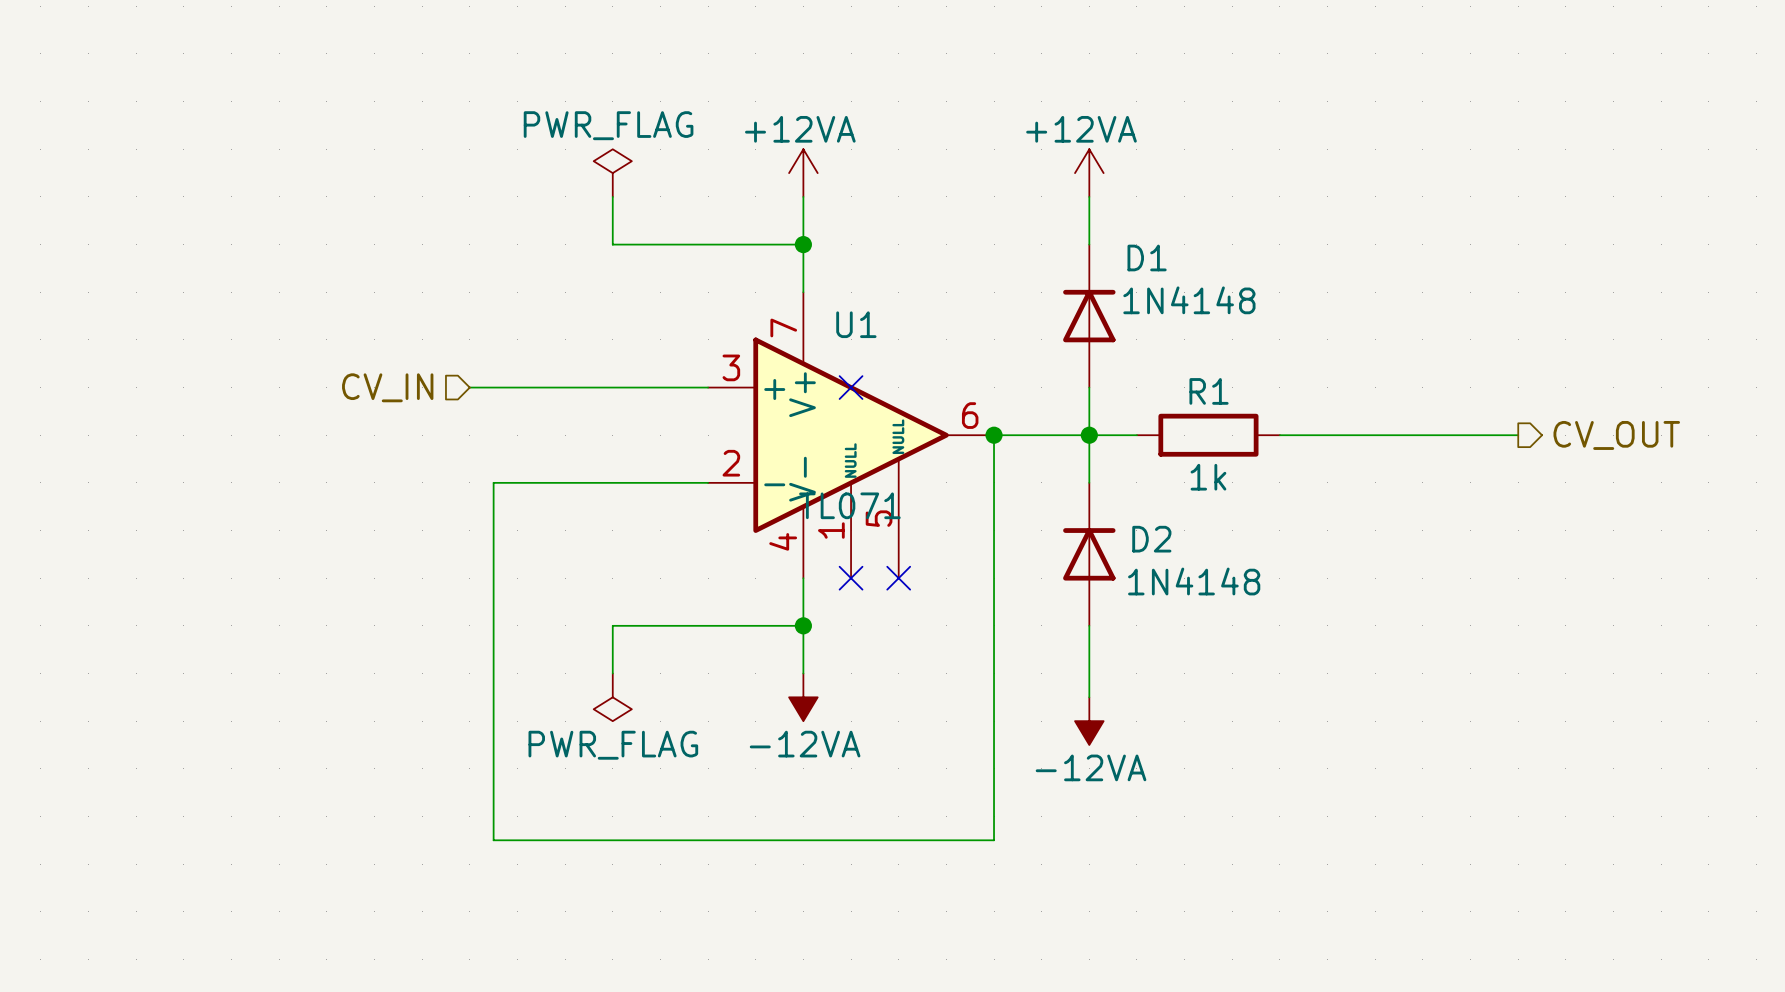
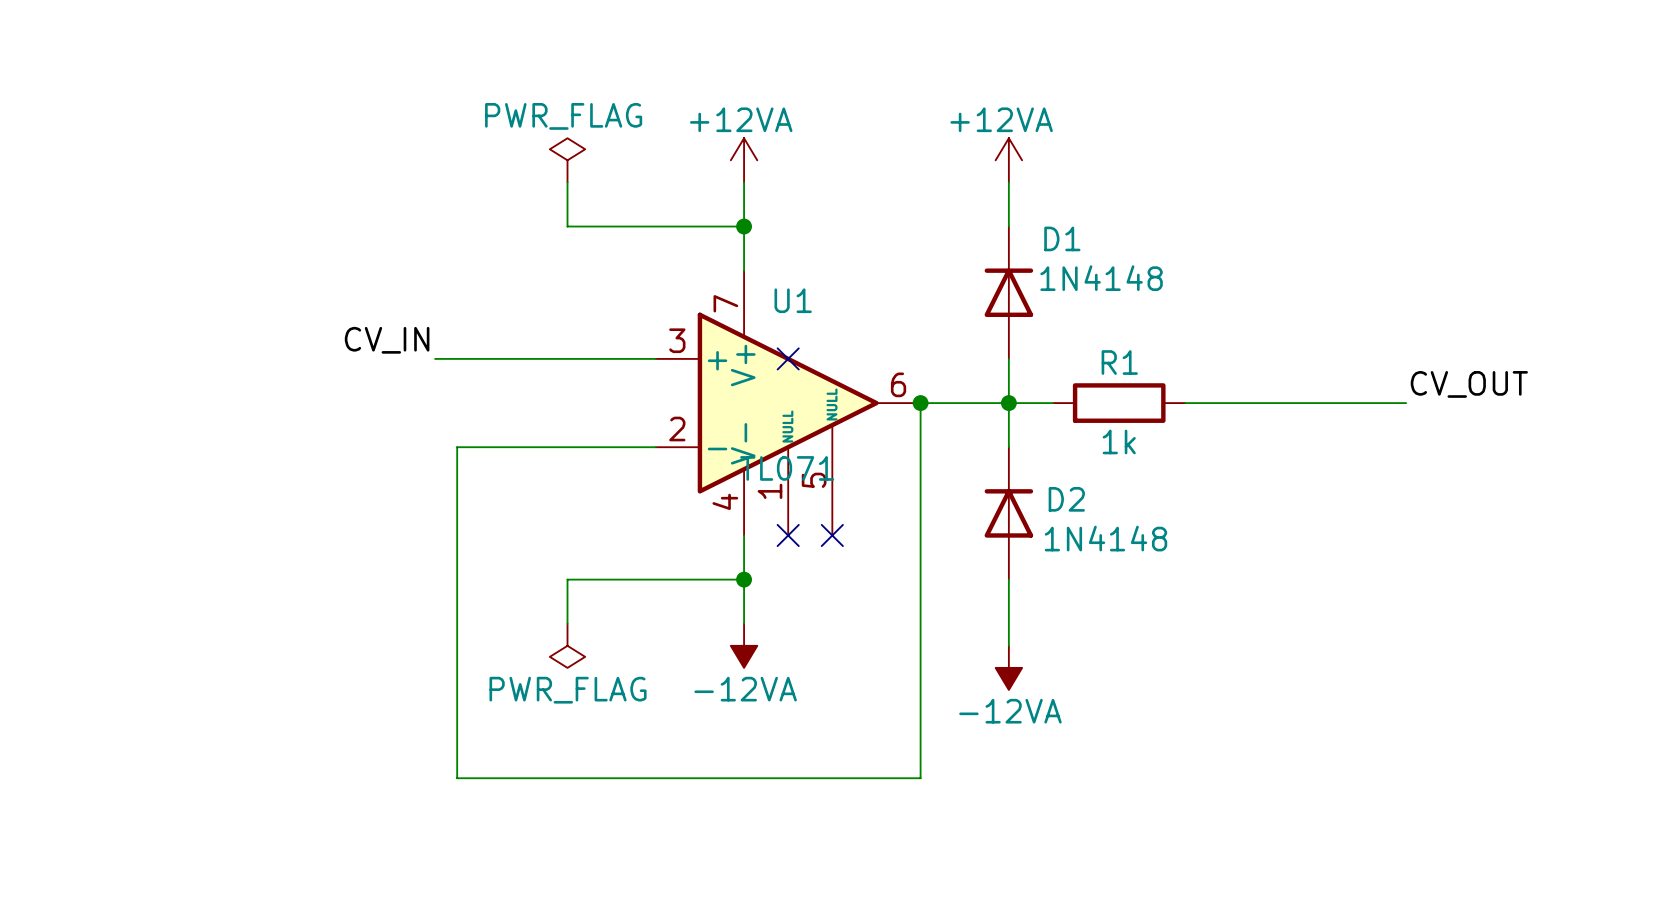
label: none -> CV_IN (387, 340)
hierarchical label: CV_IN (387, 387) -> none
label: none -> CV_OUT (1469, 384)
hierarchical label: CV_OUT (1616, 435) -> none

